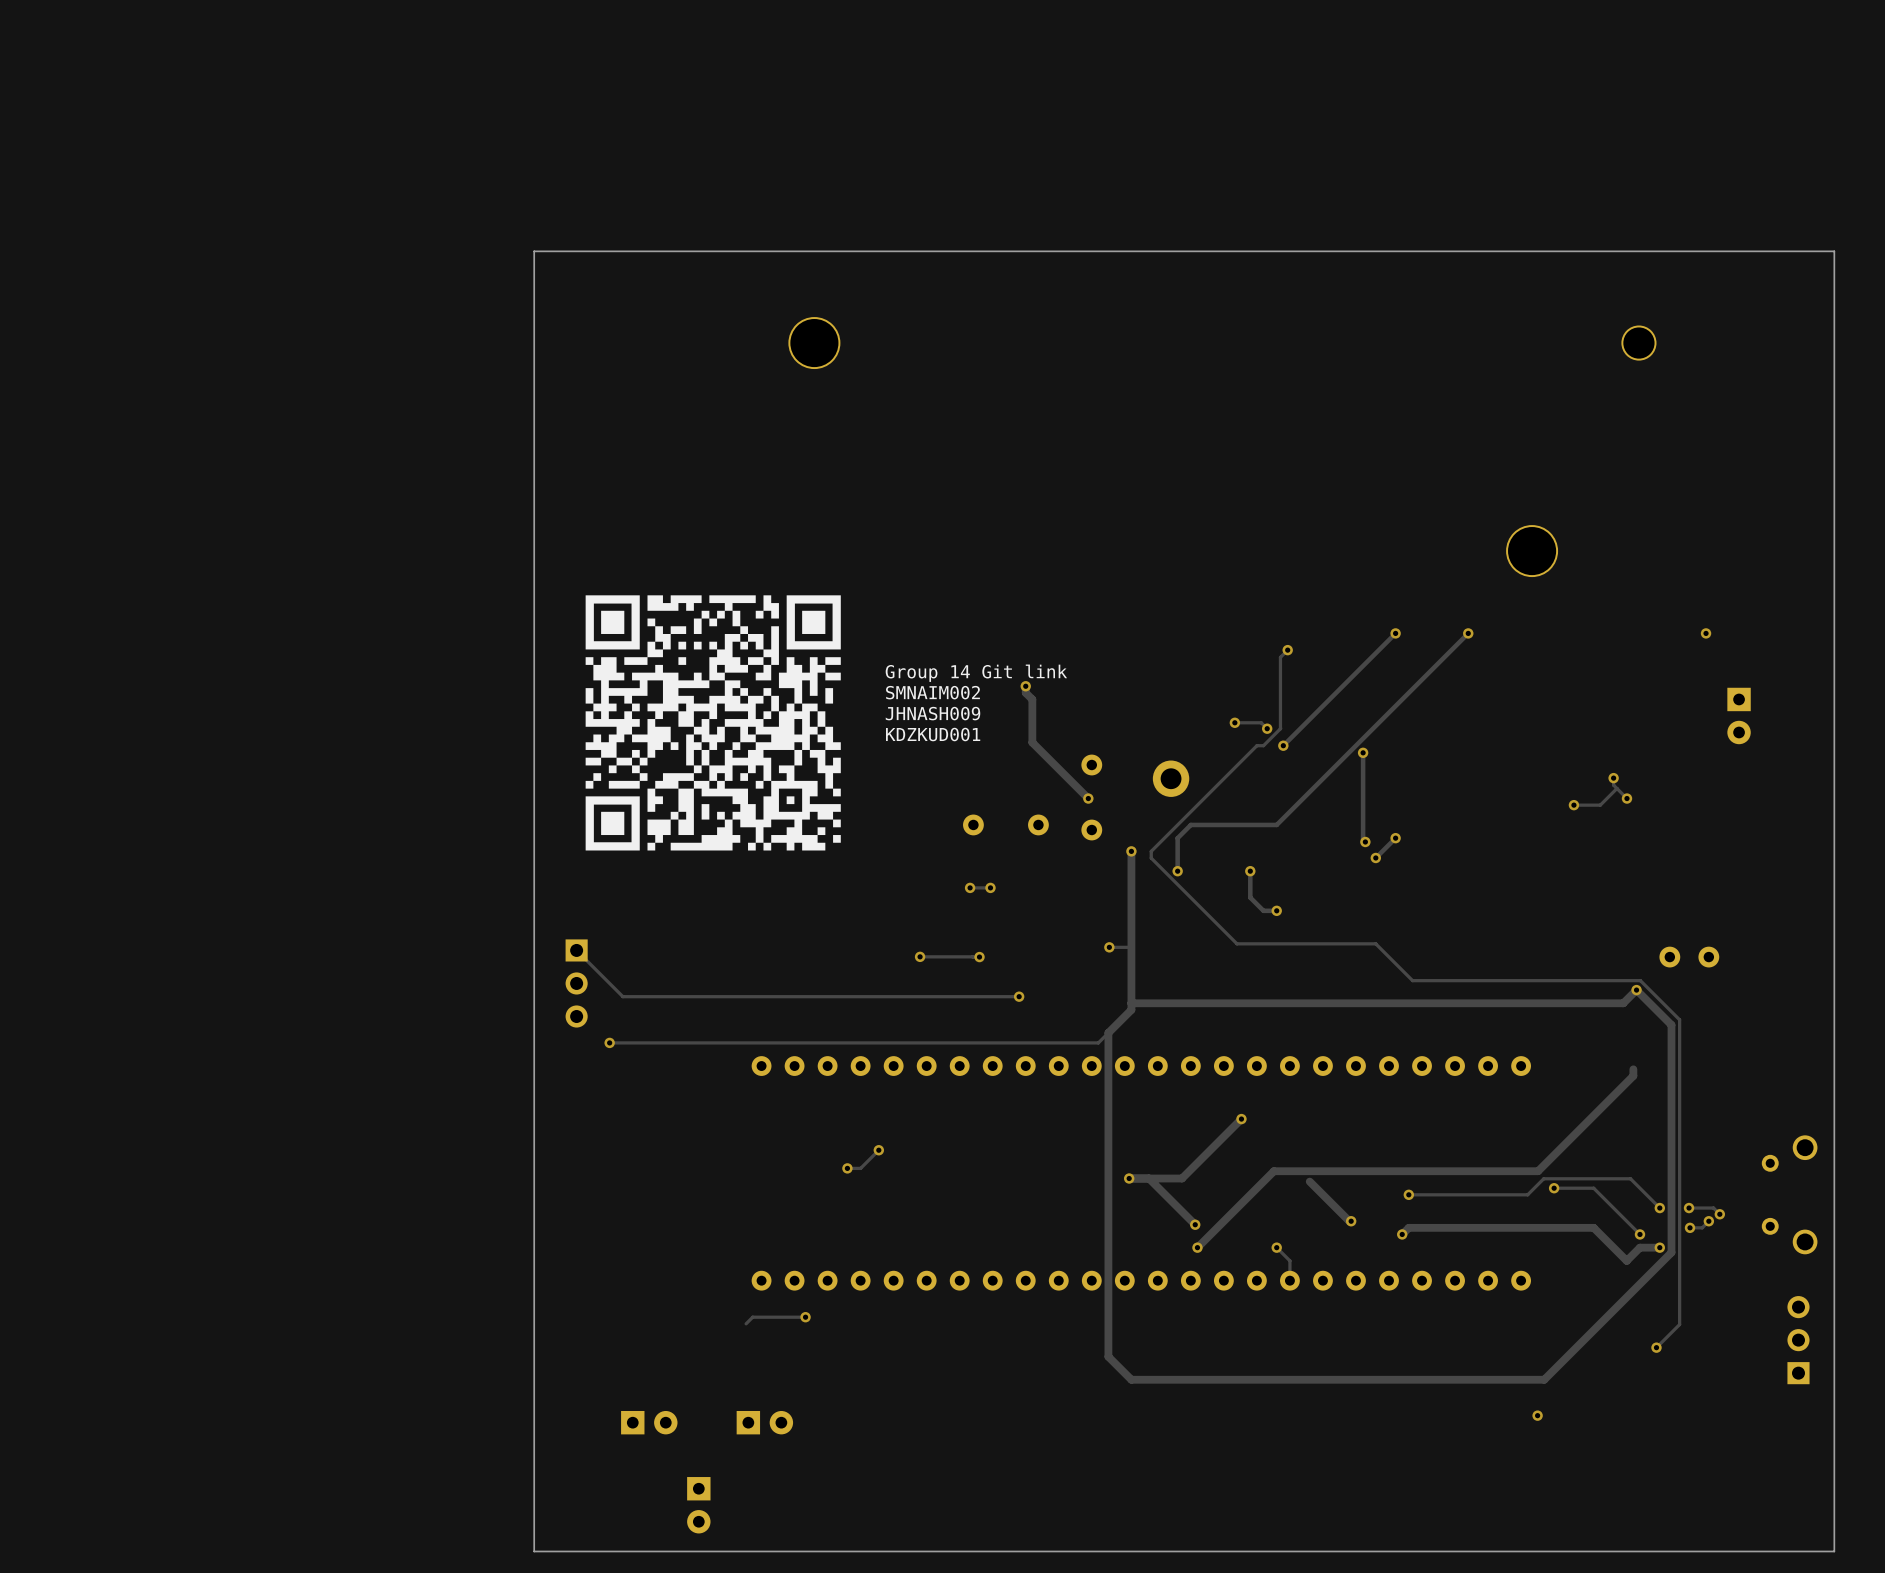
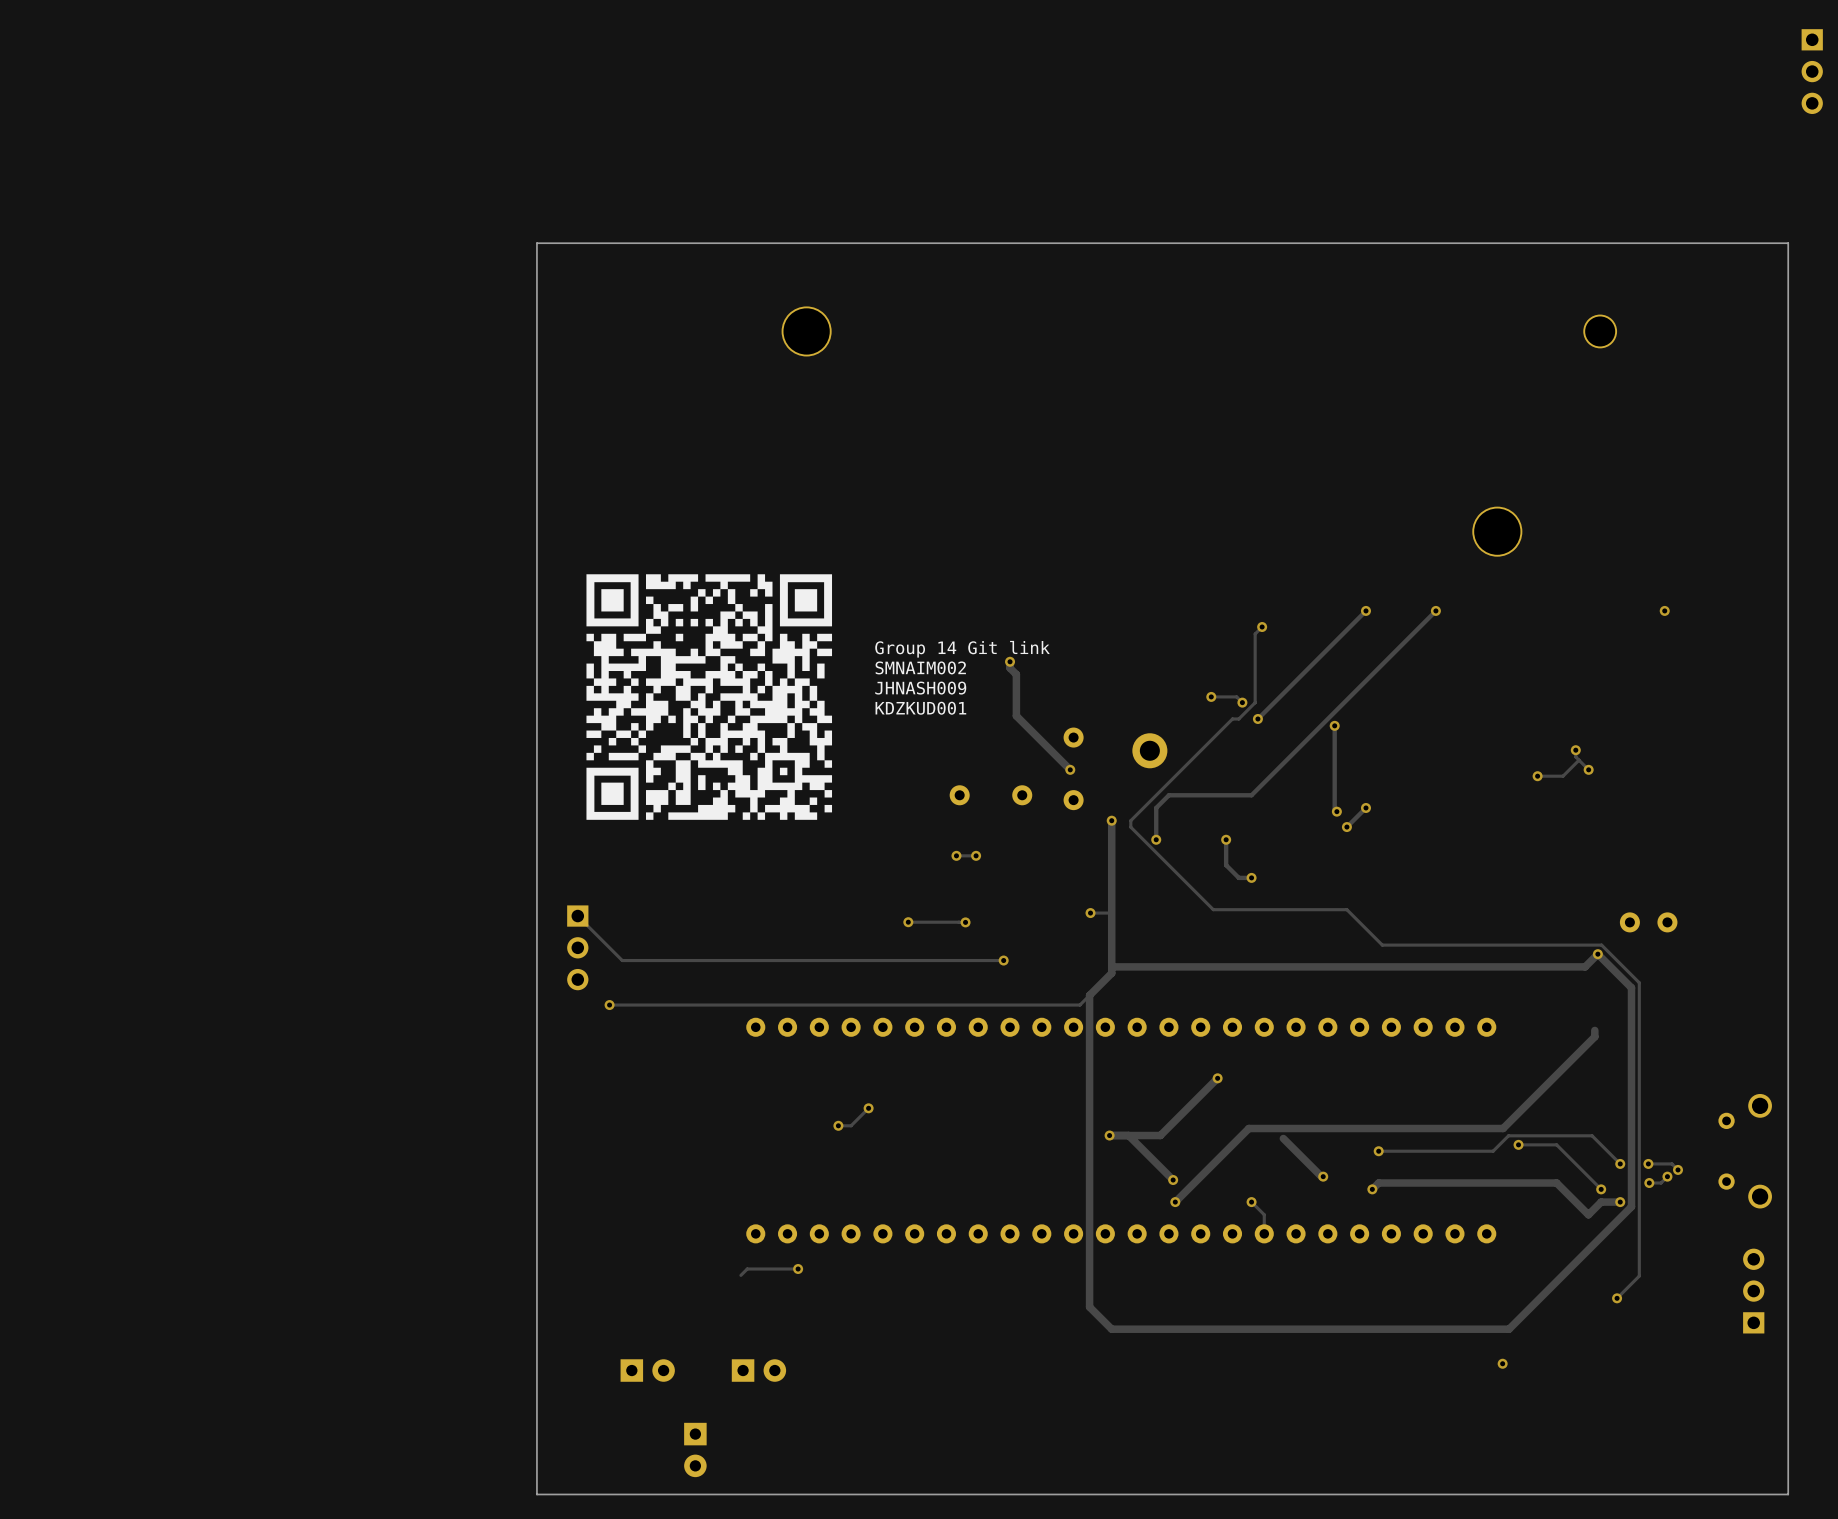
part: none -> (1812, 71)
part: (1739, 715) -> none

